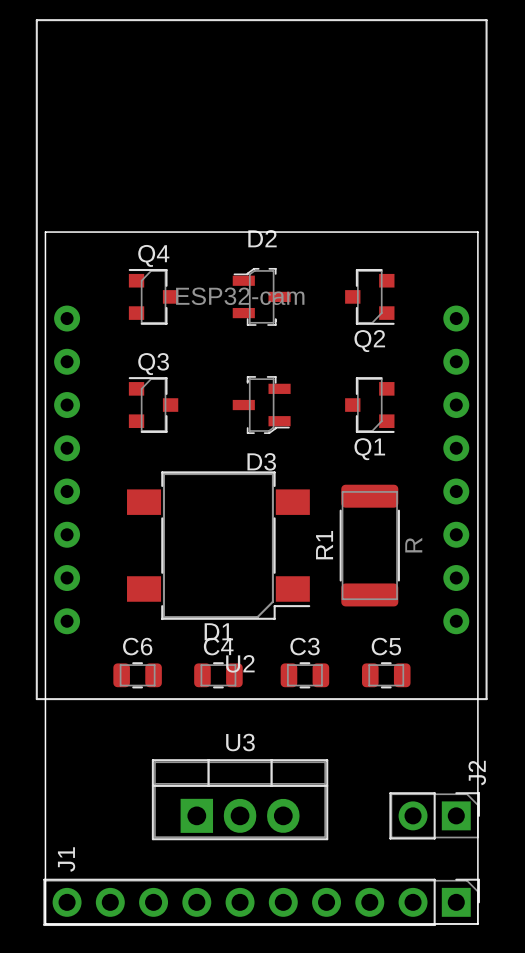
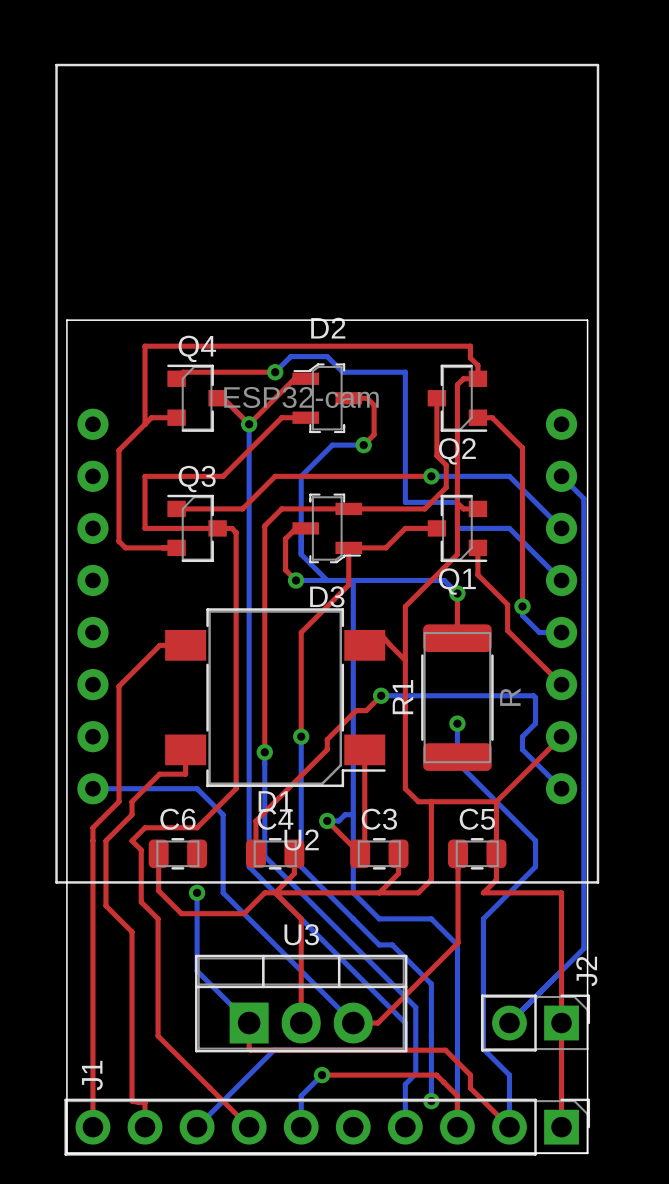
top track: none -> (275, 372) (183, 372) (176, 377)
bottom track: none -> (275, 372) (290, 356) (327, 356) (342, 372) (405, 372) (405, 502) (457, 502) (457, 528) (509, 528) (561, 580)
via: none -> (275, 372)
top track: none -> (305, 378) (294, 378) (249, 424) (223, 398) (217, 398)
bottom track: none -> (223, 398) (249, 424) (249, 866) (405, 1023) (405, 1049) (274, 1050) (197, 1127)
top track: none -> (348, 398) (367, 398) (374, 405) (374, 434) (363, 445)
top track: none -> (436, 398) (436, 455) (446, 465) (446, 487) (424, 508) (281, 508) (264, 525) (264, 752)
top track: none -> (176, 417) (151, 417) (118, 450) (118, 541) (125, 547) (176, 547)
top track: none -> (305, 417) (281, 417) (223, 476) (145, 476) (145, 528) (231, 528) (236, 532) (236, 788) (197, 827) (145, 827) (132, 840) (141, 850) (141, 902) (158, 918) (158, 1036) (249, 1127)
top track: none -> (477, 418) (492, 417) (522, 447) (522, 606)
top track: none -> (145, 424) (145, 346) (470, 346) (470, 357) (477, 365) (477, 378) (463, 378) (457, 384) (457, 554) (405, 606) (405, 788) (418, 801) (496, 801)
via: none -> (249, 424)
bottom track: none -> (363, 445) (332, 445) (301, 476) (301, 554) (327, 580)
via: none -> (363, 445)
top track: none -> (431, 476) (275, 476) (242, 508) (176, 508)
bottom track: none -> (431, 476) (509, 476) (561, 528)
via: none -> (431, 476)
bottom track: none -> (561, 476) (583, 498) (583, 948) (509, 1023)
top track: none -> (457, 502) (463, 508) (477, 508)
top track: none -> (305, 528) (296, 528) (285, 538) (285, 570) (296, 580)
top track: none -> (436, 528) (405, 528) (385, 547) (348, 547) (348, 584) (301, 632) (301, 736)
top track: none -> (477, 547) (477, 574) (507, 604) (507, 630) (561, 684)
bottom track: none -> (296, 580) (444, 580) (457, 593)
via: none -> (296, 580)
bottom track: none -> (353, 580) (353, 892) (379, 918) (431, 918) (457, 944) (457, 1127)
top track: none -> (457, 593) (457, 638)
via: none -> (457, 593)
via: none -> (522, 606)
bottom track: none -> (522, 608) (522, 615) (539, 632) (561, 632)
top track: none -> (185, 645) (159, 645) (118, 686) (118, 801) (92, 827) (92, 1127)
top track: none -> (364, 645) (379, 632) (405, 660)
top track: none -> (381, 695) (366, 710) (356, 710) (327, 739) (327, 749) (255, 820) (255, 853)
bottom track: none -> (381, 695) (533, 695) (535, 697) (535, 723) (522, 736) (522, 749) (561, 788)
via: none -> (381, 695)
bottom track: none -> (457, 723) (457, 762) (535, 840) (535, 866) (483, 918) (483, 1049) (509, 1075) (509, 1127)
via: none -> (457, 723)
bottom track: none -> (301, 736) (301, 866) (379, 944) (392, 944) (431, 983) (431, 1101)
via: none -> (301, 736)
top track: none -> (561, 736) (496, 801)
top track: none -> (185, 749) (185, 774) (159, 774) (132, 801) (132, 814) (105, 840) (105, 905) (132, 931) (132, 1101) (145, 1102) (145, 1127)
top track: none -> (364, 749) (364, 849) (360, 853) (327, 820)
bottom track: none -> (264, 752) (264, 856) (415, 1007) (415, 1073) (405, 1084) (405, 1127)
via: none -> (264, 752)
bottom track: none -> (92, 788) (197, 788) (223, 814) (223, 892) (353, 1023)
top track: none -> (431, 801) (431, 879) (418, 892) (264, 892) (243, 913) (181, 913) (158, 890) (158, 853)
top track: none -> (496, 801) (496, 879) (483, 892) (561, 892) (561, 1127)
bottom track: none -> (353, 814) (345, 814) (338, 820) (327, 820)
via: none -> (327, 820)
top track: none -> (294, 853) (294, 873) (275, 892) (301, 918) (301, 1023)
top track: none -> (398, 853) (398, 873) (379, 892)
top track: none -> (458, 853) (458, 942) (377, 1023) (353, 1023)
bottom track: none -> (197, 892) (197, 970) (249, 1023)
via: none -> (197, 892)
top track: none -> (249, 1023) (250, 1050) (445, 1050) (470, 1075) (470, 1088) (509, 1127)
top track: none -> (322, 1075) (436, 1075) (457, 1095) (457, 1127)
bottom track: none -> (322, 1075) (301, 1095) (301, 1127)
via: none -> (322, 1075)
via: none -> (431, 1101)

